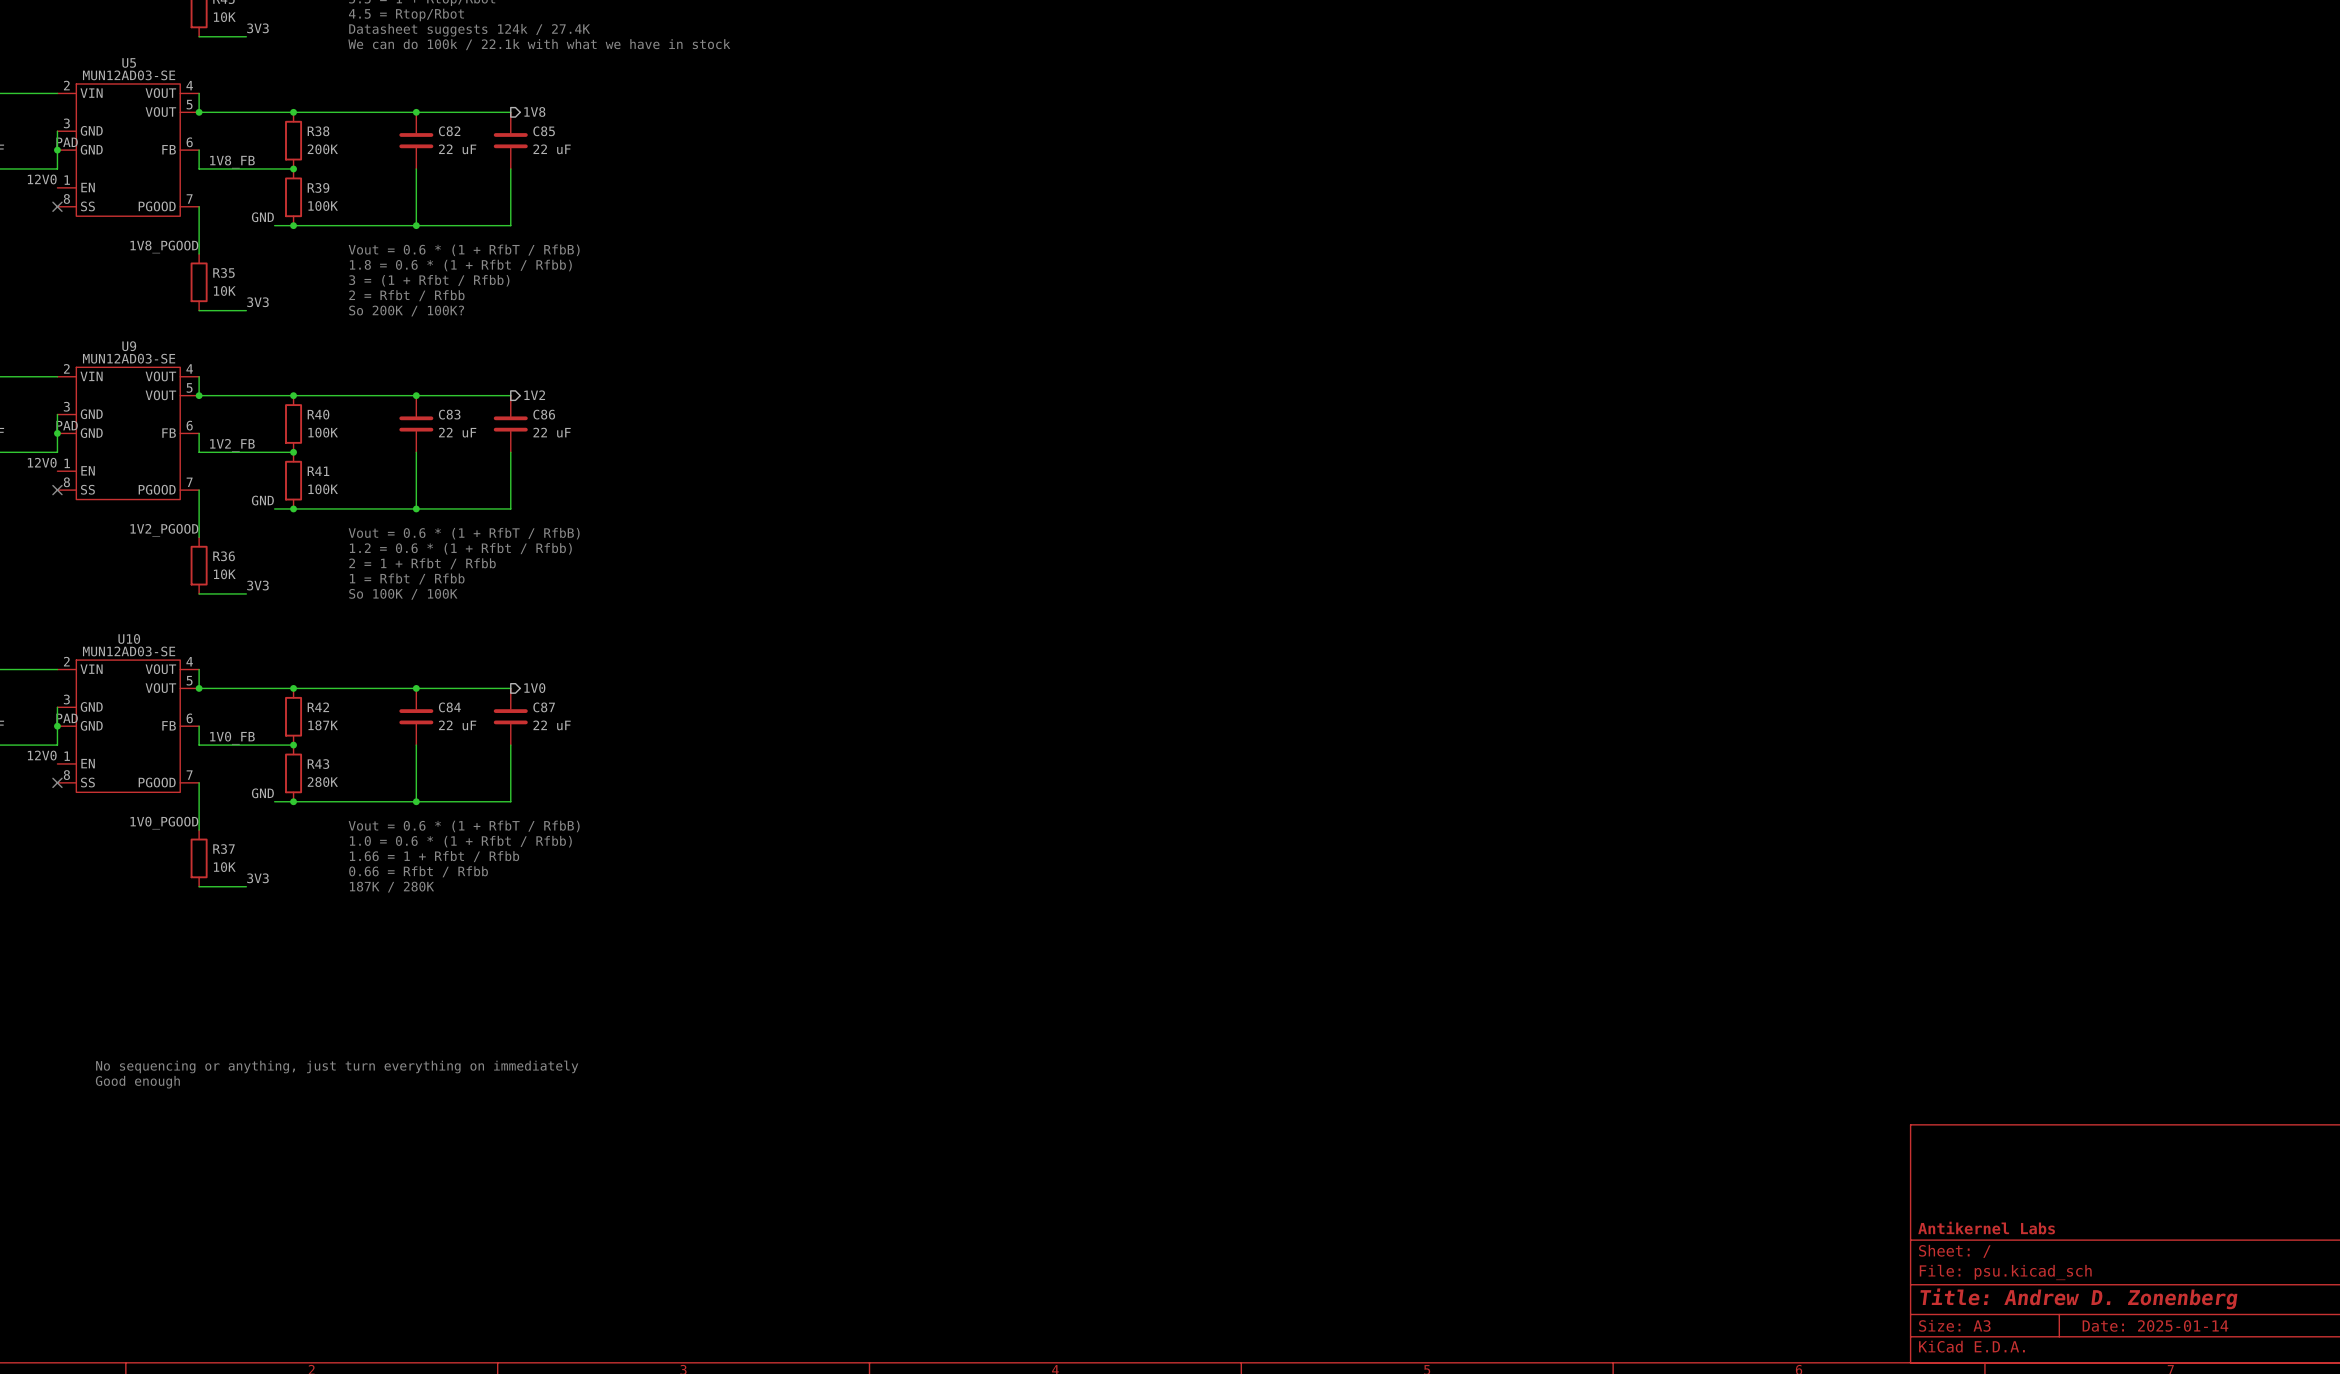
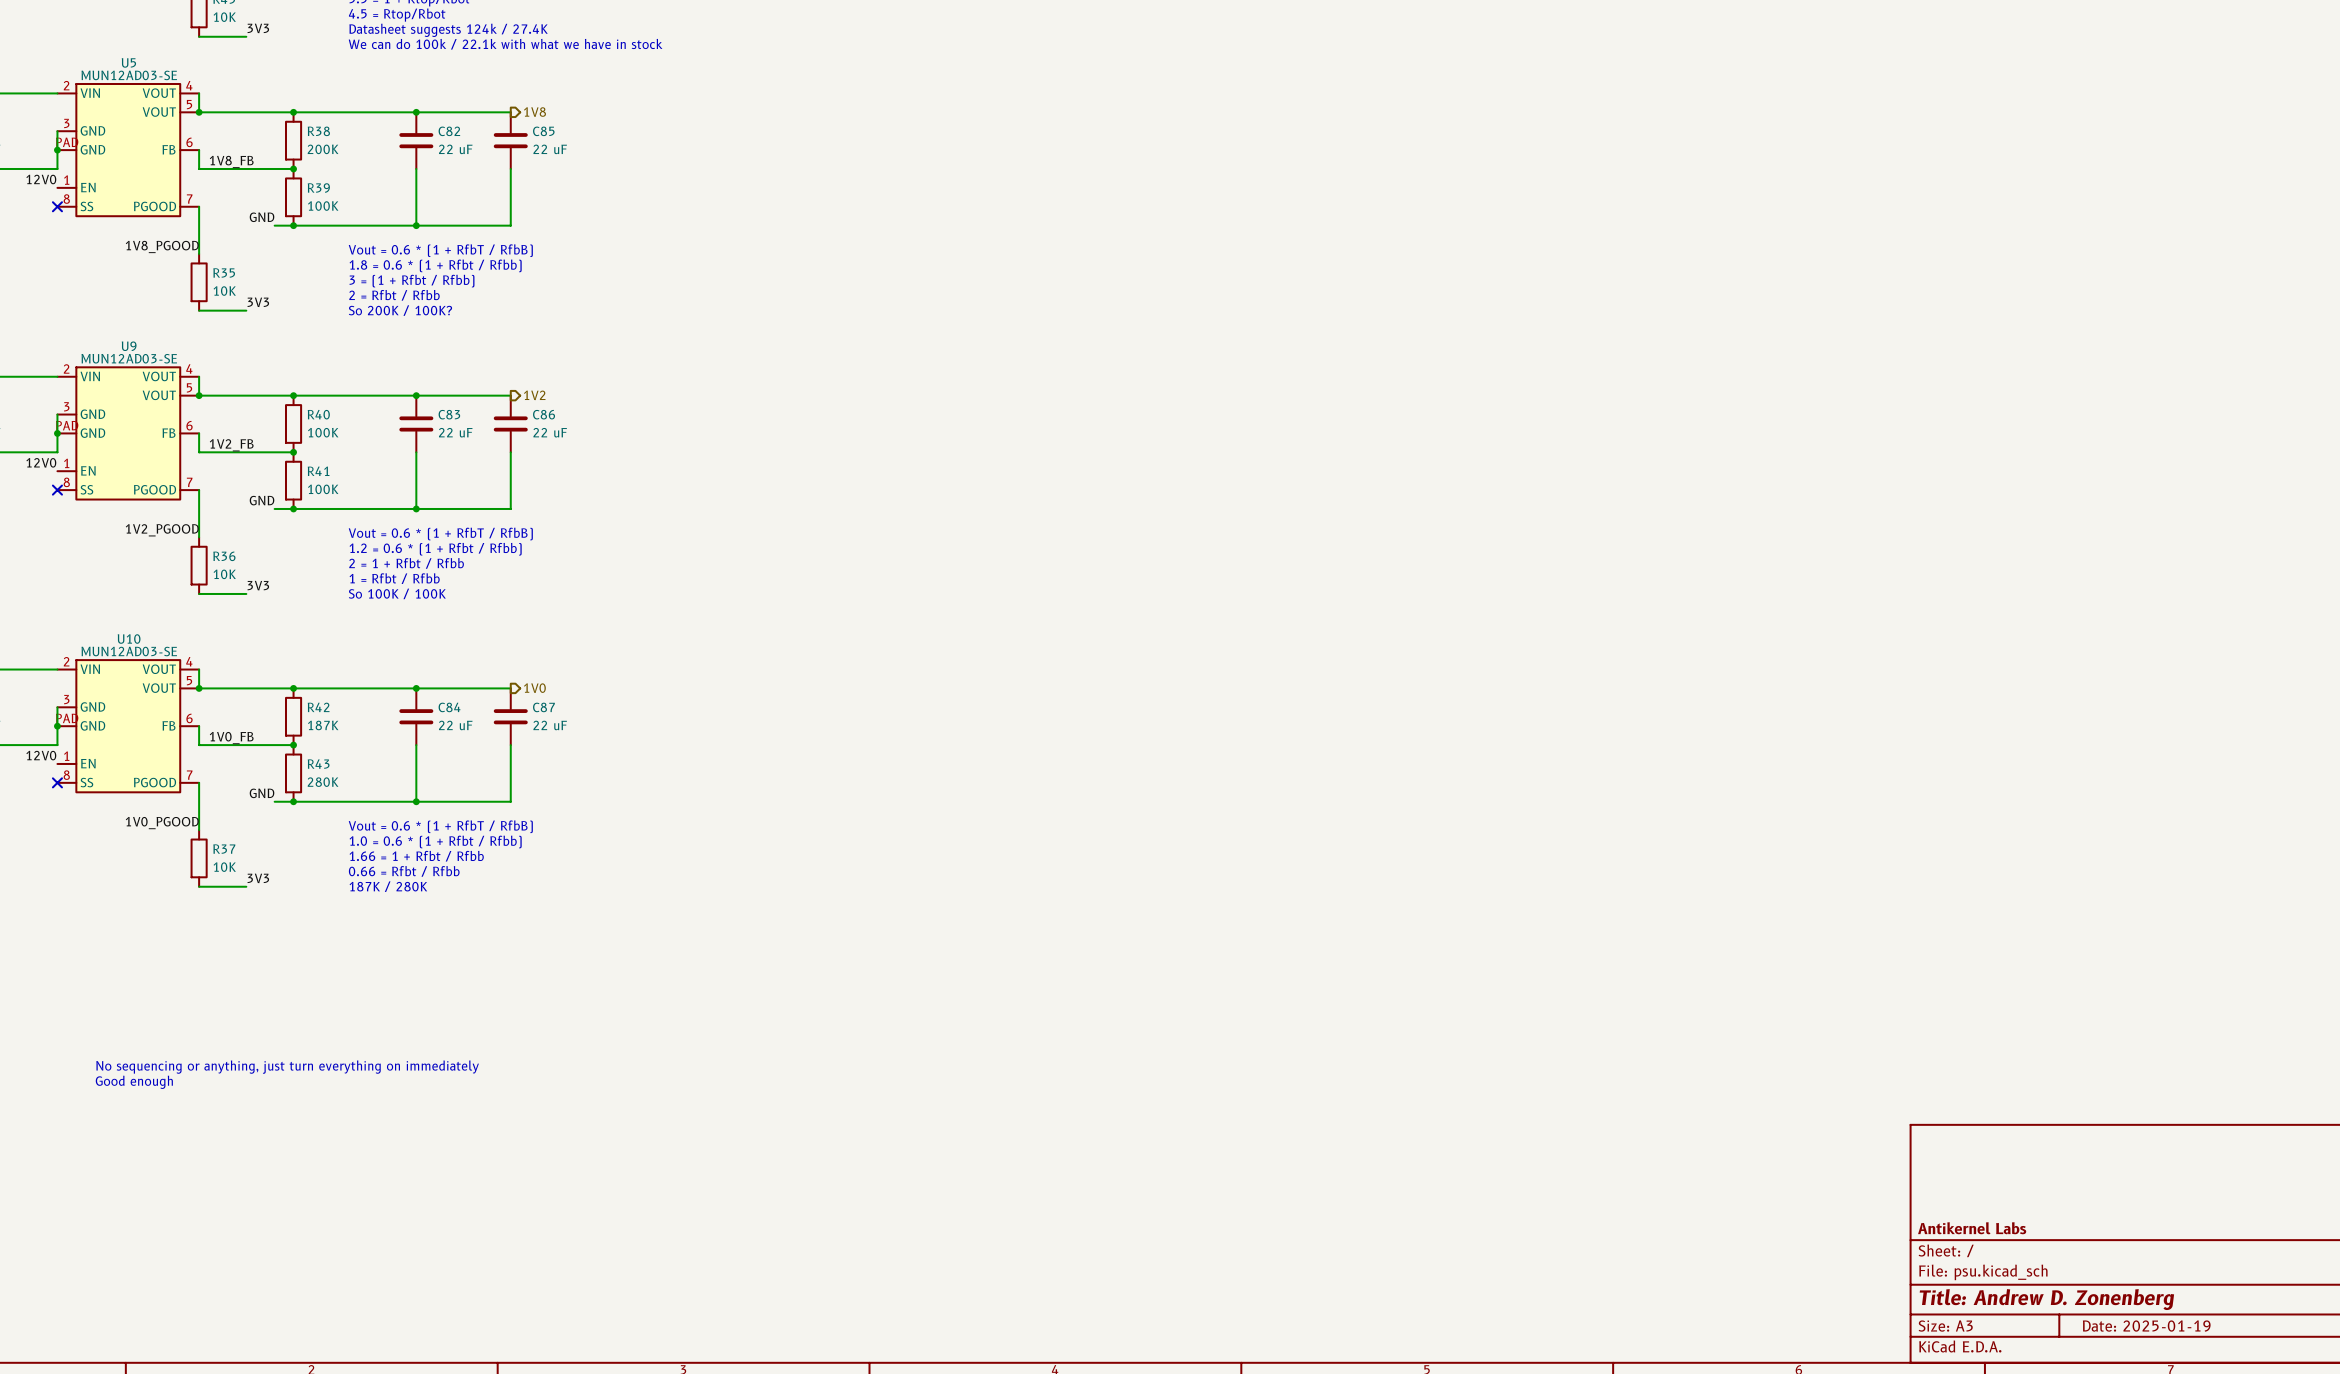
title block: Date: 2025-01-14 (2155, 1325) -> Date: 2025-01-19 (2146, 1326)

